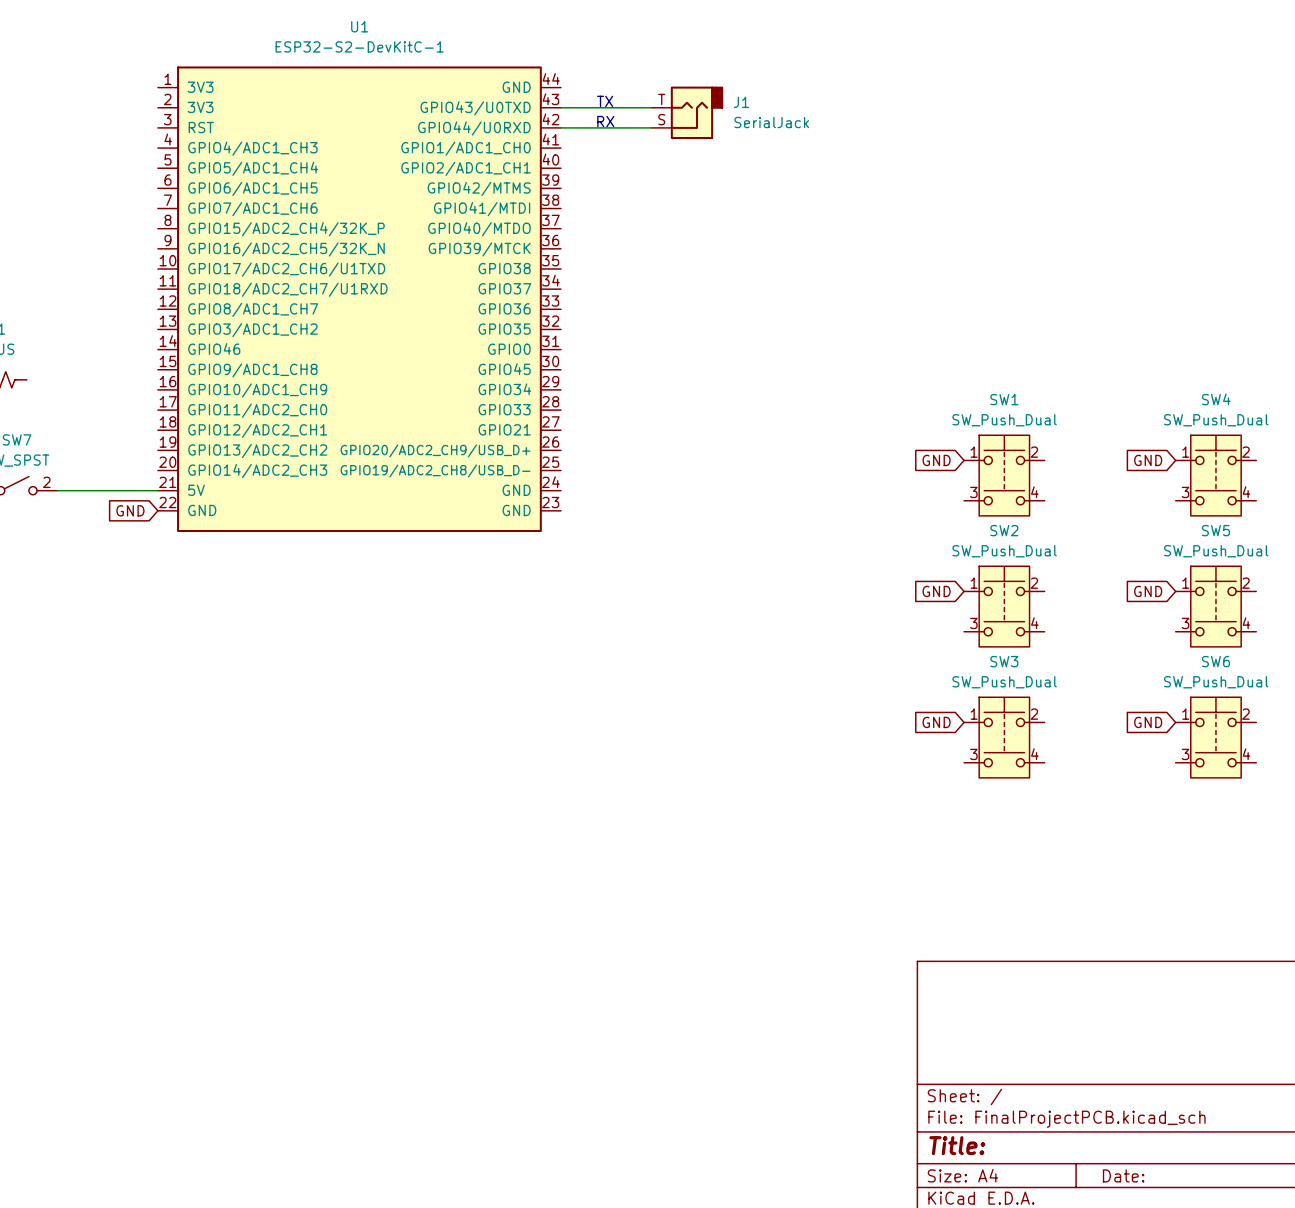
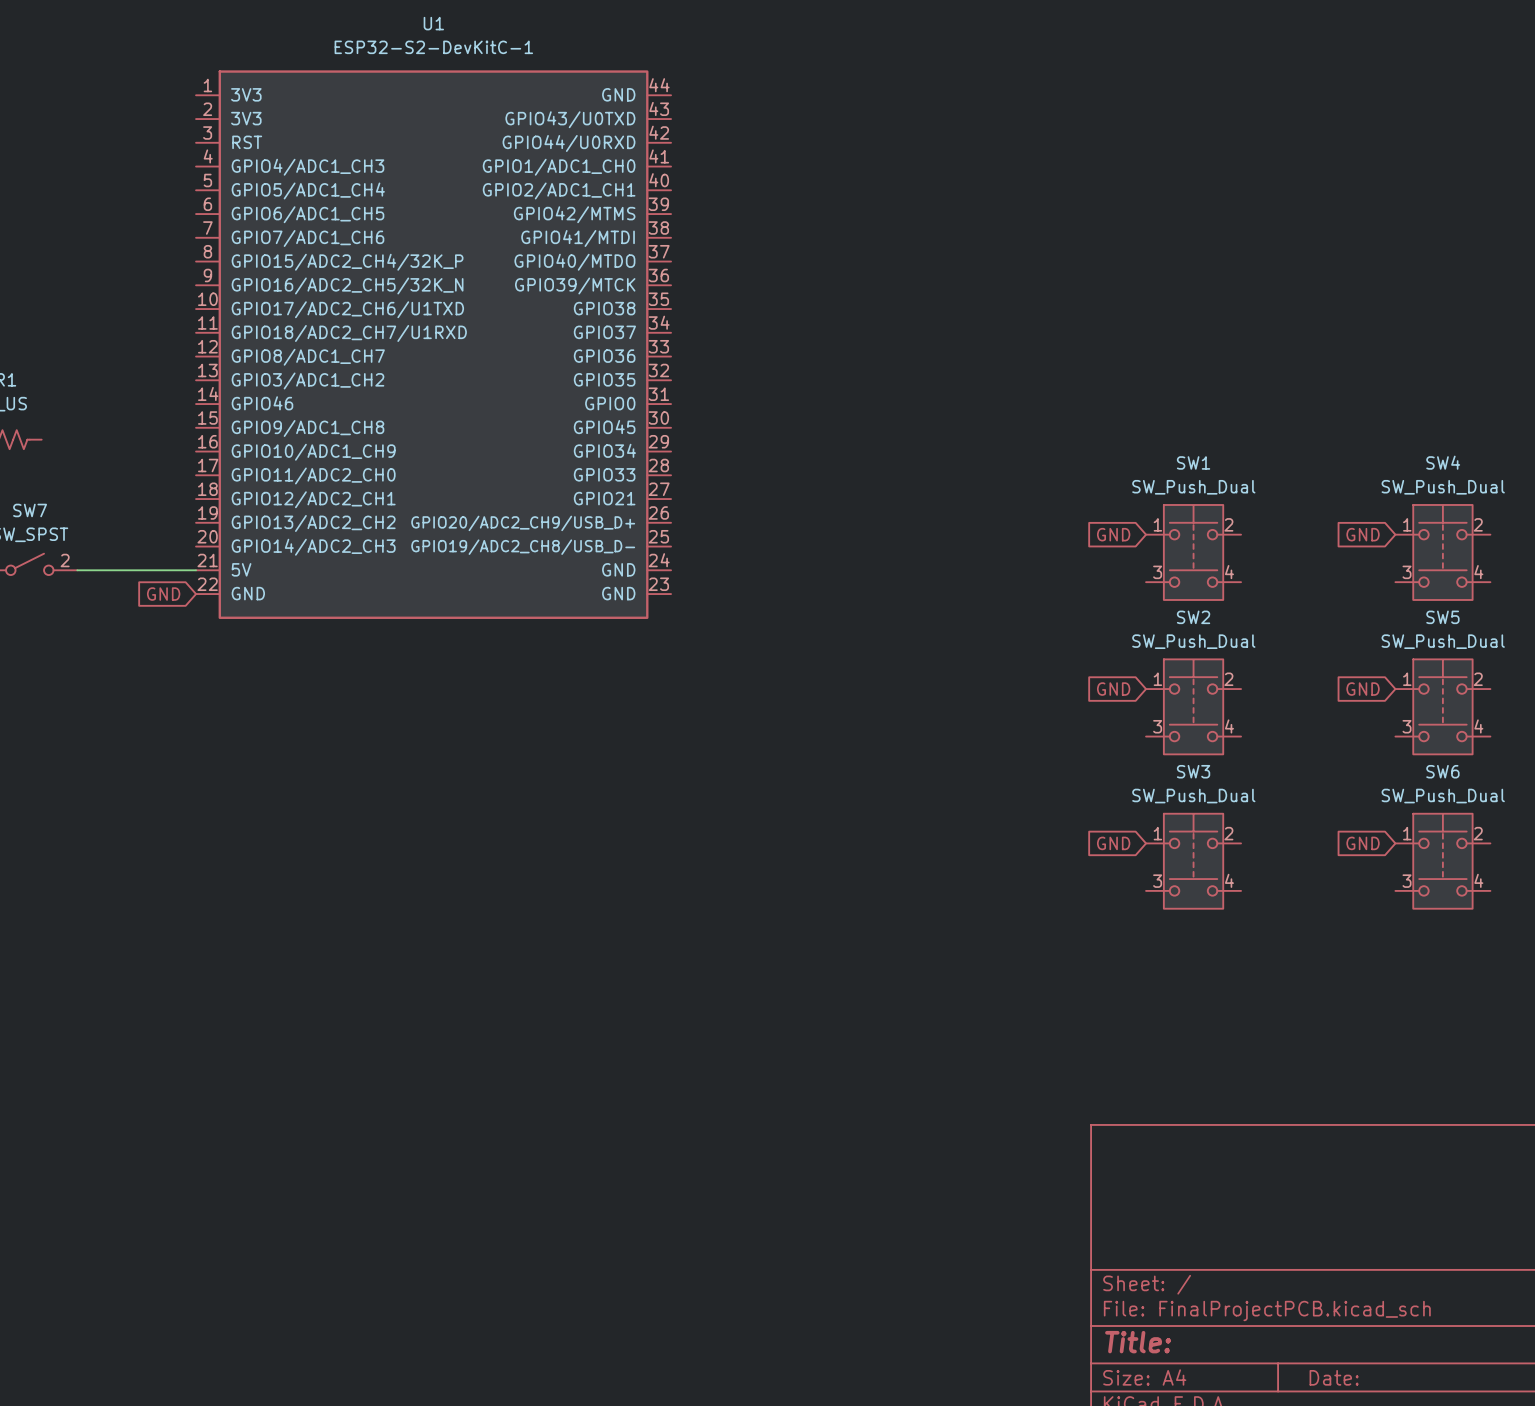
text: TX (605, 101) -> none
wire: (560, 107) (651, 107) -> none
J1: SerialJack (687, 112) -> none
text: RX (605, 121) -> none
wire: (560, 127) (651, 127) -> none

